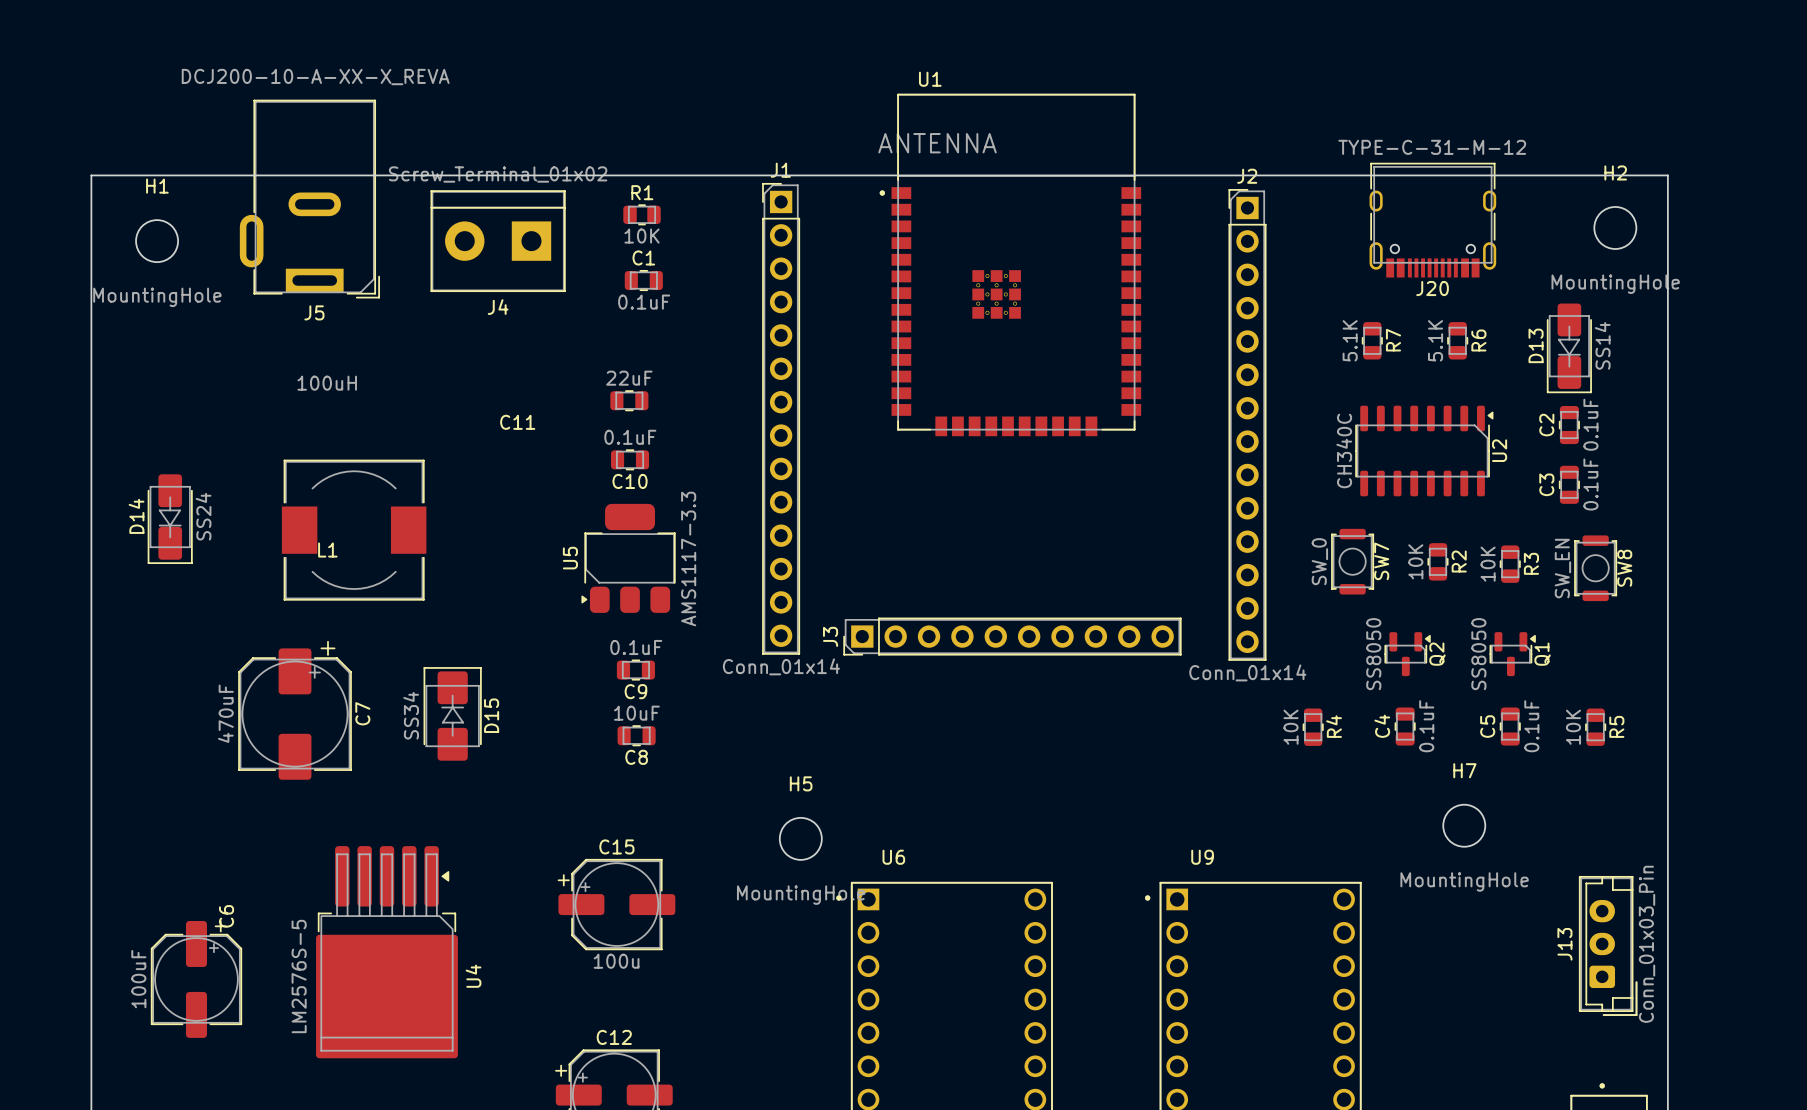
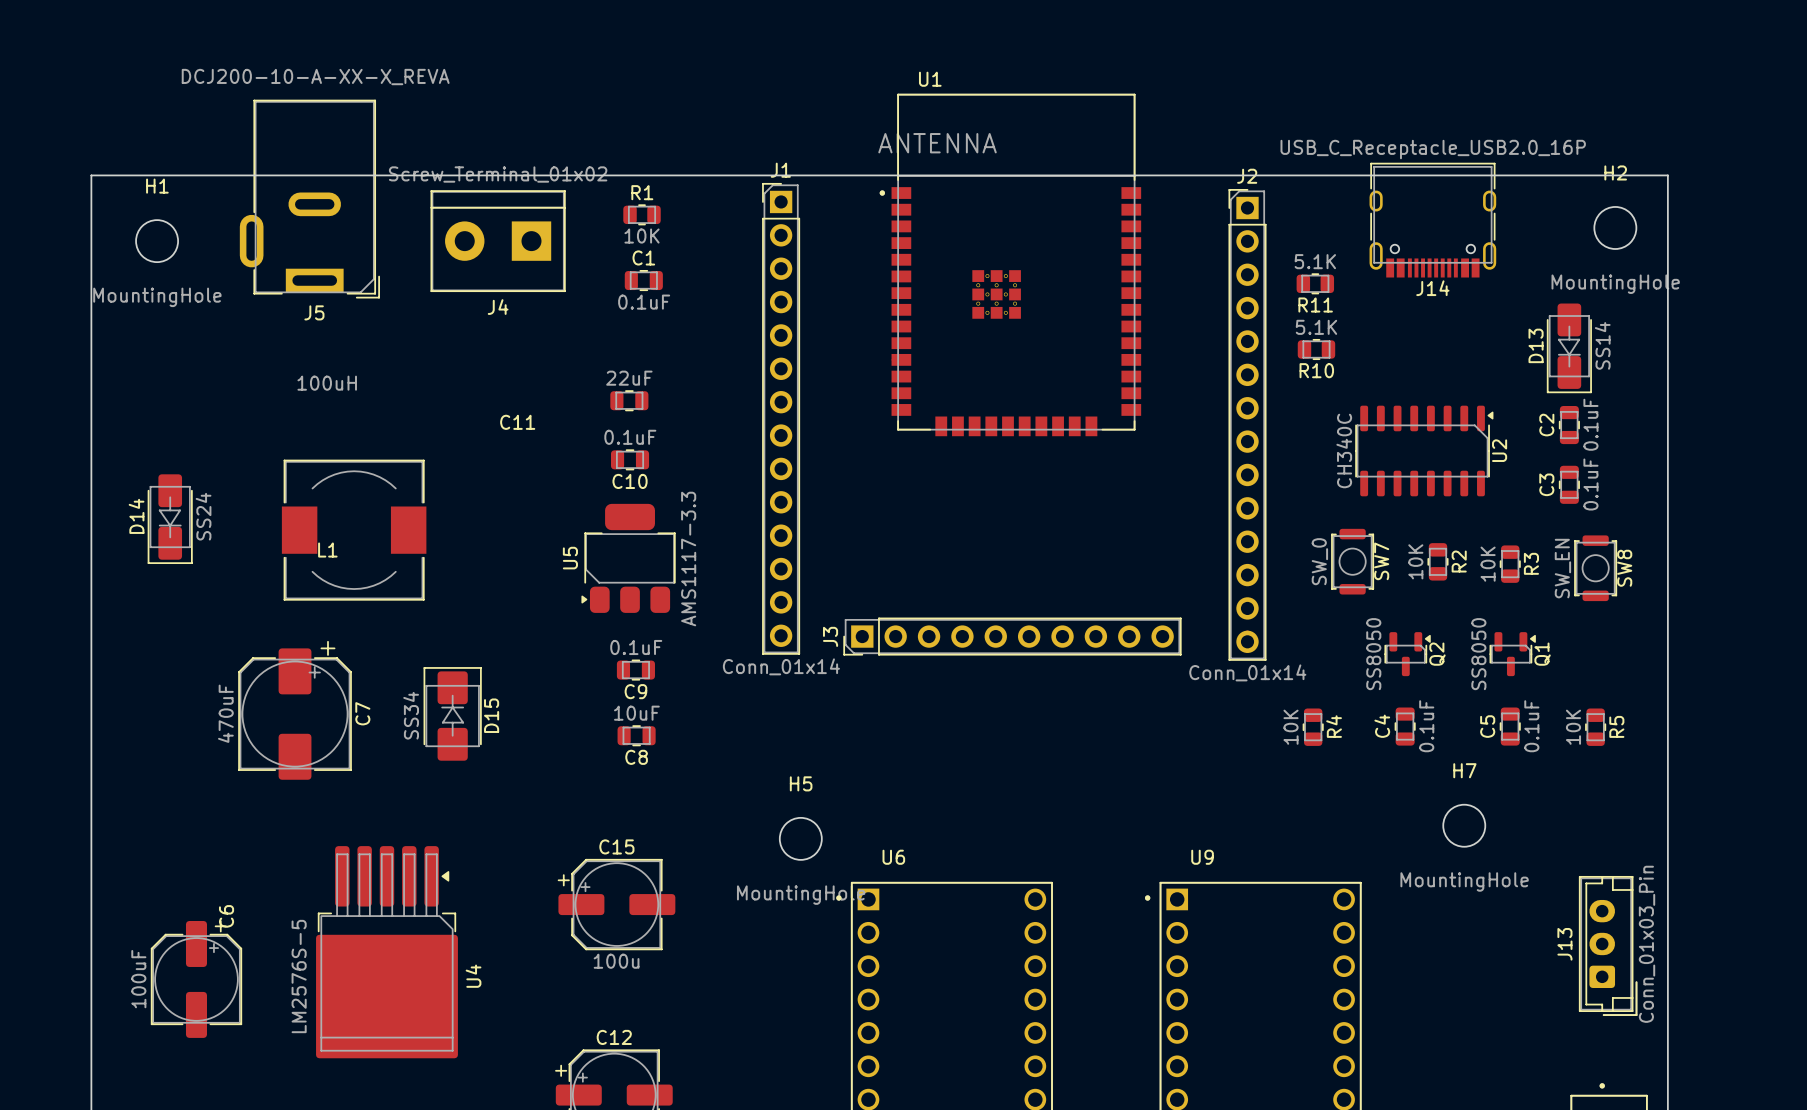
J20 value: TYPE-C-31-M-12 (1432, 147) -> USB_C_Receptacle_USB2.0_16P (1433, 149)
R11: none -> 5.1K (1315, 283)
J20 name: J20 (1432, 288) -> J14 (1432, 288)
R7: 5.1K (1372, 340) -> none
R6: 5.1K (1457, 340) -> none
R10: none -> 5.1K (1316, 349)

